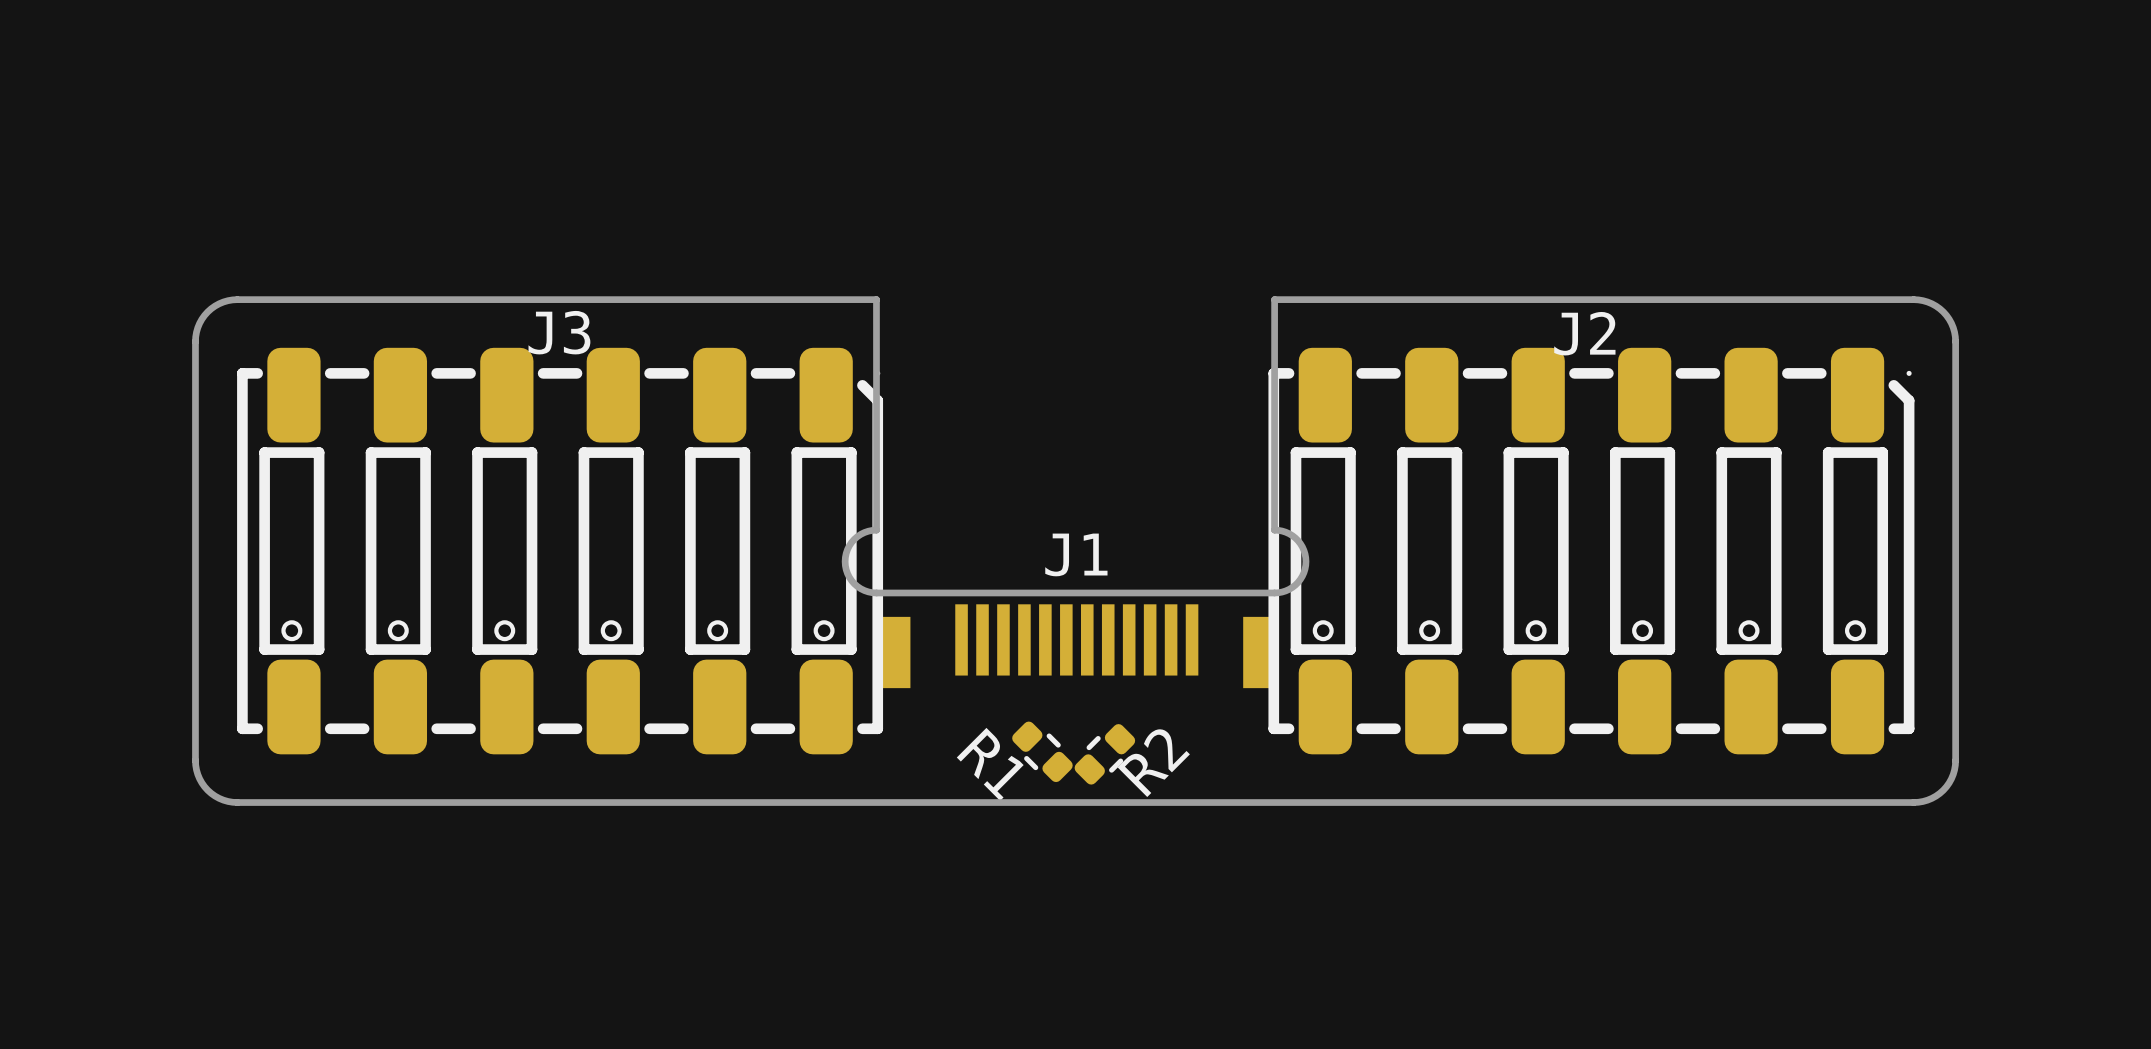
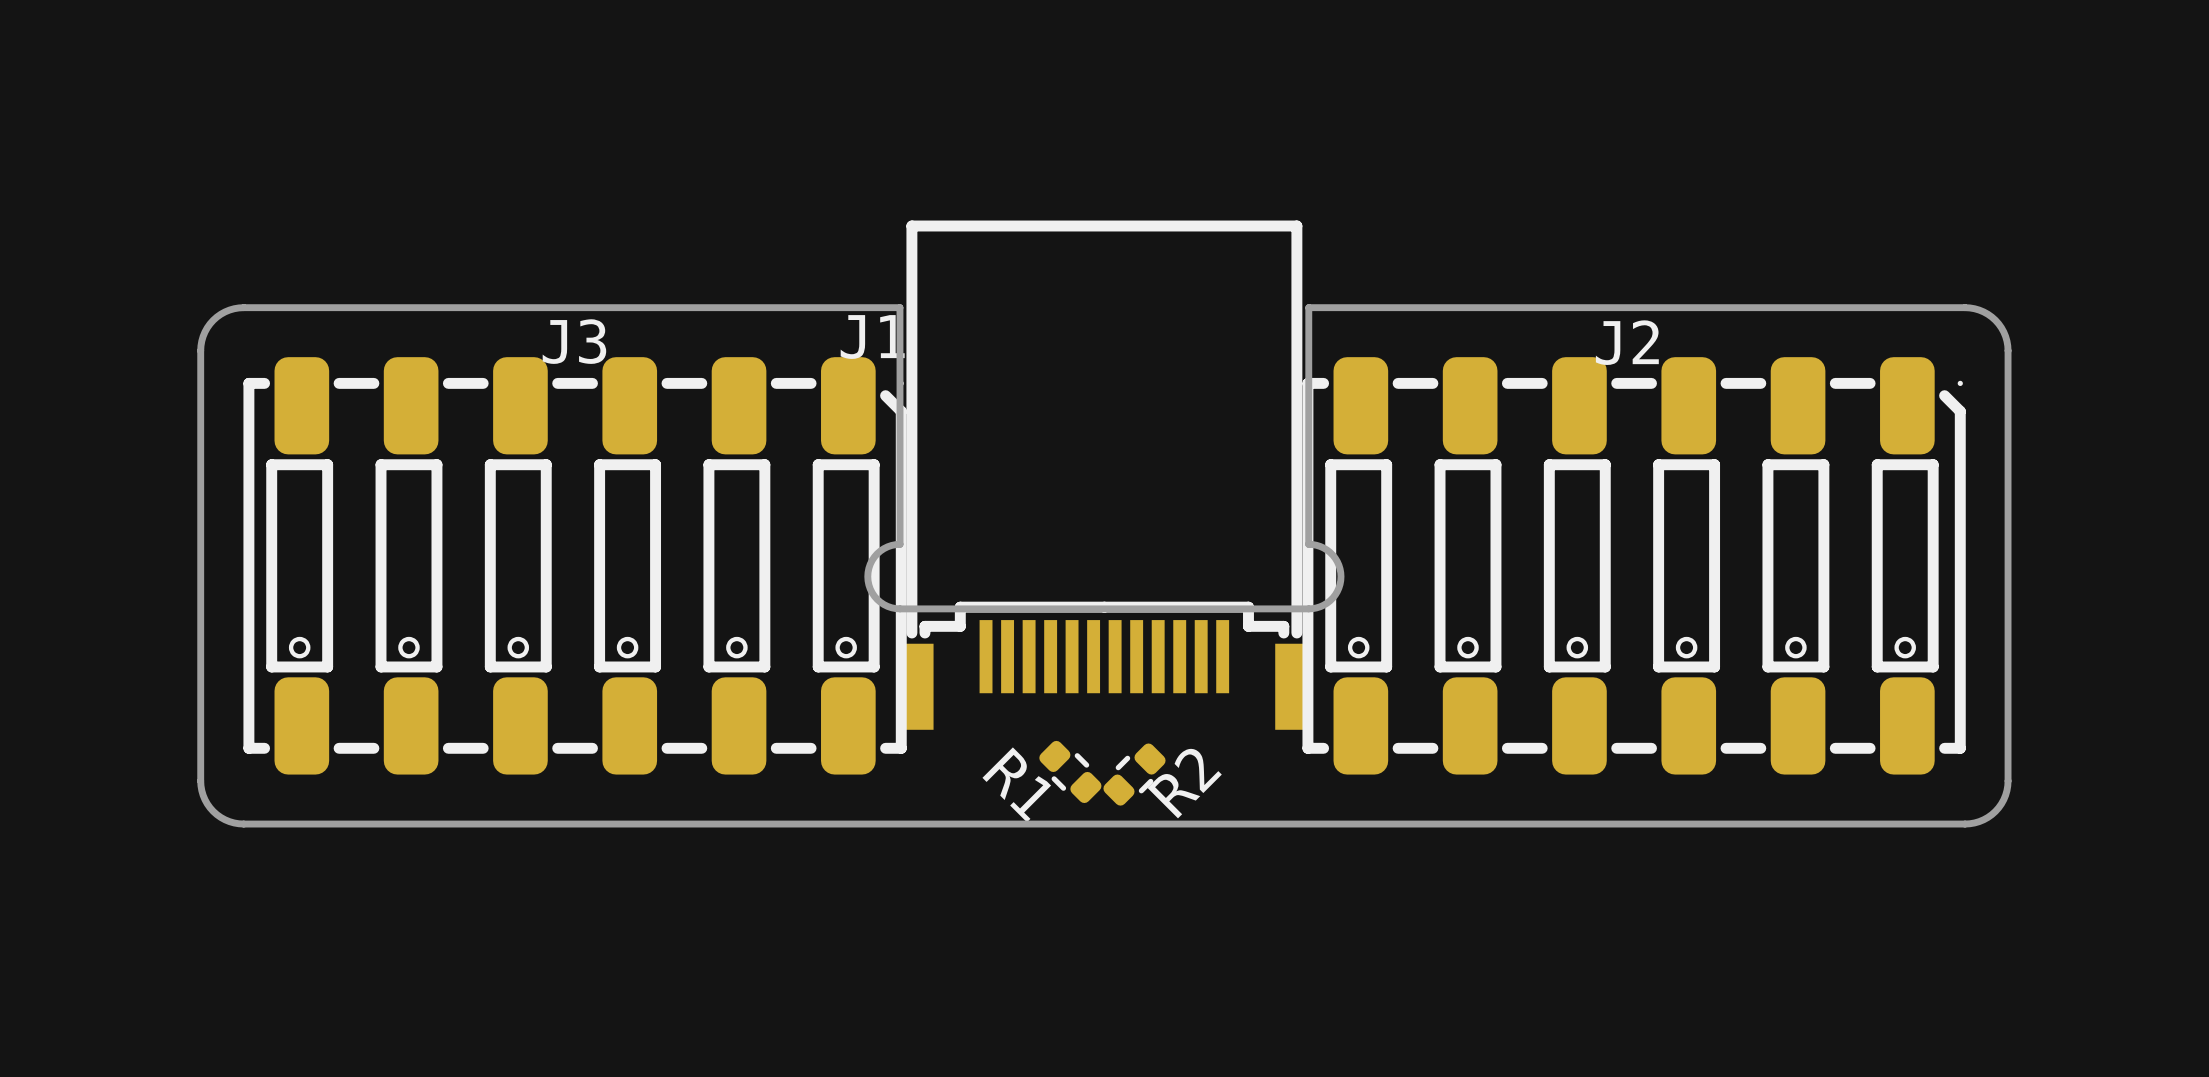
J1 name position: J1 (1076, 554) -> J1 (872, 337)
J1 footprint: [881, 604, 1273, 689] -> [903, 220, 1306, 730]

